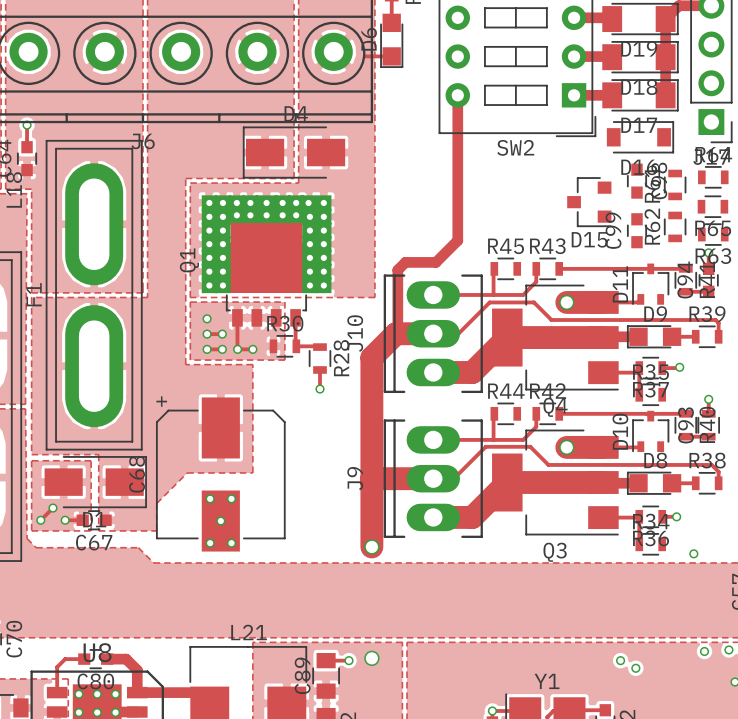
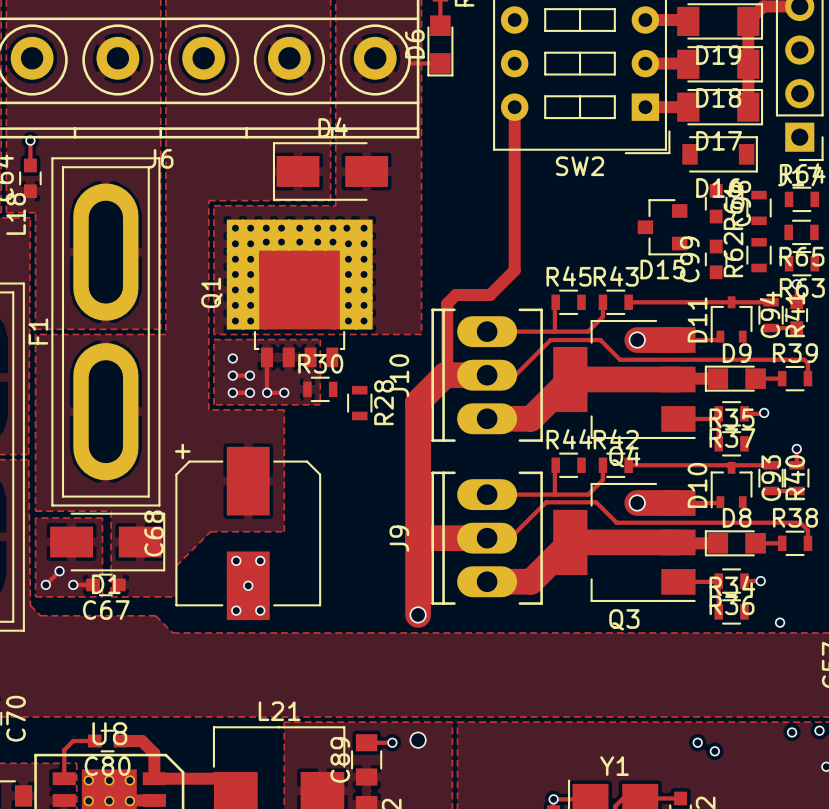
track: (295, 317) (295, 345) (320, 347) -> none
track: (320, 369) (320, 389) -> none
via: (320, 389) -> none

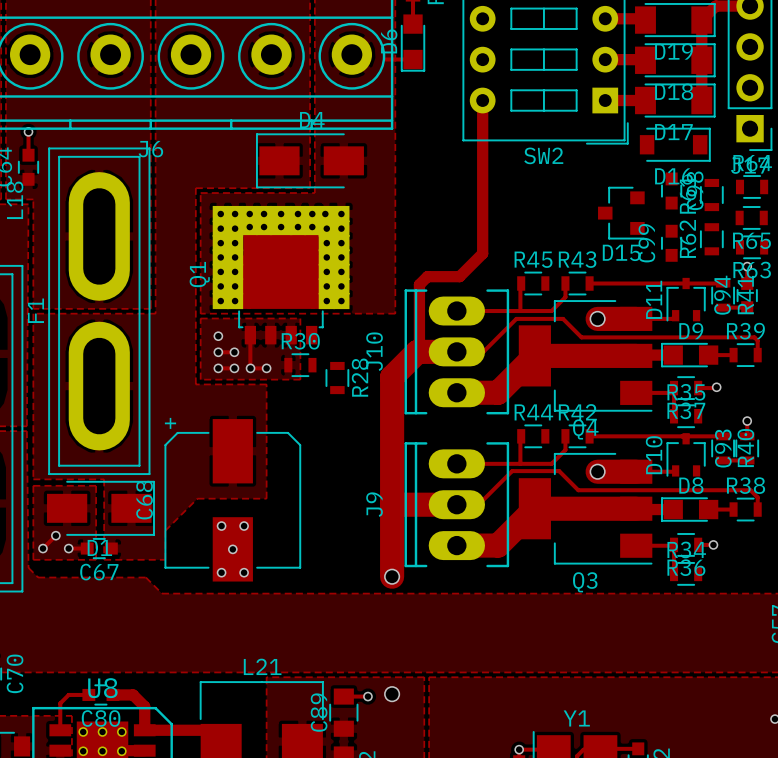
via: (780, 622) -> none
via: (819, 730) -> none
via: (792, 732) -> none
via: (697, 742) -> none
via: (714, 751) -> none

